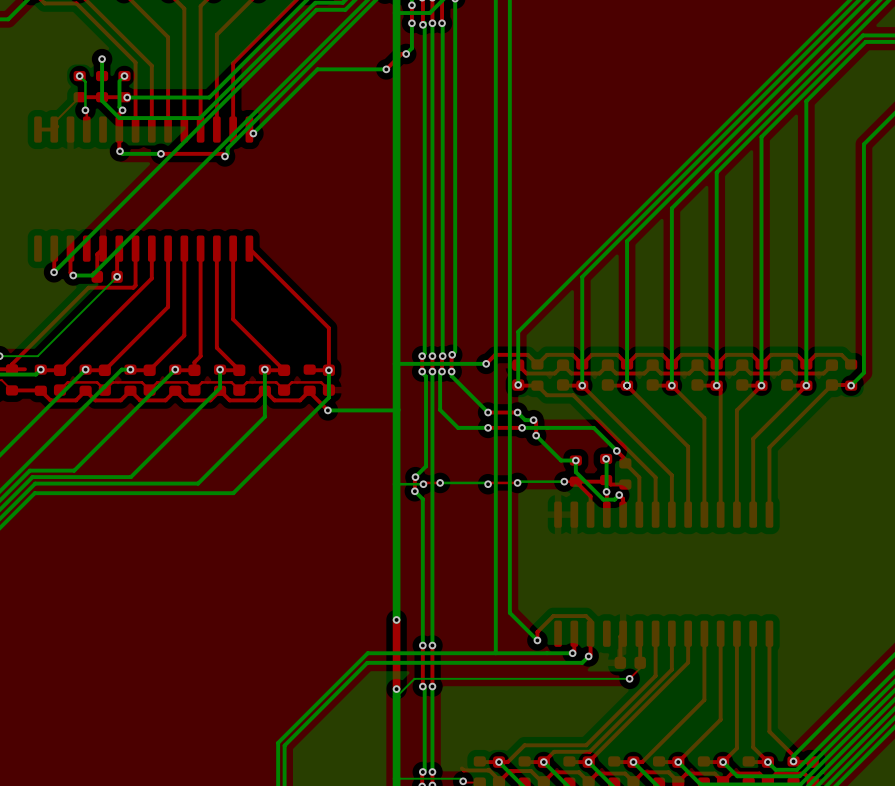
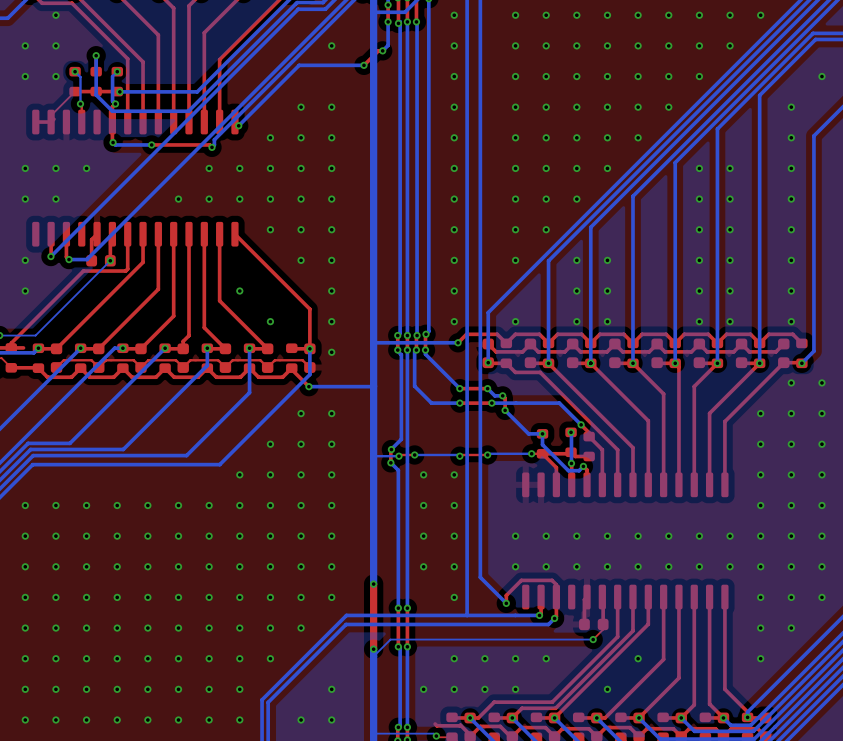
via: none -> (55, 15)
via: none -> (454, 15)
via: none -> (515, 15)
via: none -> (546, 15)
via: none -> (576, 15)
via: none -> (607, 15)
via: none -> (638, 15)
via: none -> (668, 15)
via: none -> (699, 15)
via: none -> (730, 15)
via: none -> (760, 15)
via: none -> (25, 45)
via: none -> (55, 45)
via: none -> (331, 45)
via: none -> (454, 45)
via: none -> (515, 45)
via: none -> (546, 45)
via: none -> (576, 45)
via: none -> (607, 45)
via: none -> (638, 45)
via: none -> (668, 45)
via: none -> (699, 45)
via: none -> (730, 45)
via: none -> (25, 76)
via: none -> (55, 76)
via: none -> (454, 76)
via: none -> (515, 76)
via: none -> (546, 76)
via: none -> (576, 76)
via: none -> (607, 76)
via: none -> (638, 76)
via: none -> (668, 76)
via: none -> (699, 76)
via: none -> (821, 76)
via: none -> (301, 107)
via: none -> (331, 107)
via: none -> (454, 107)
via: none -> (515, 107)
via: none -> (546, 107)
via: none -> (576, 107)
via: none -> (607, 107)
via: none -> (638, 107)
via: none -> (668, 107)
via: none -> (791, 107)
via: none -> (270, 137)
via: none -> (301, 137)
via: none -> (331, 137)
via: none -> (454, 137)
via: none -> (515, 137)
via: none -> (546, 137)
via: none -> (576, 137)
via: none -> (607, 137)
via: none -> (638, 137)
via: none -> (791, 137)
via: none -> (25, 168)
via: none -> (55, 168)
via: none -> (86, 168)
via: none -> (209, 168)
via: none -> (239, 168)
via: none -> (270, 168)
via: none -> (301, 168)
via: none -> (331, 168)
via: none -> (454, 168)
via: none -> (515, 168)
via: none -> (546, 168)
via: none -> (576, 168)
via: none -> (607, 168)
via: none -> (699, 168)
via: none -> (730, 168)
via: none -> (791, 168)
via: none -> (25, 199)
via: none -> (55, 199)
via: none -> (178, 199)
via: none -> (209, 199)
via: none -> (239, 199)
via: none -> (270, 199)
via: none -> (301, 199)
via: none -> (331, 199)
via: none -> (454, 199)
via: none -> (515, 199)
via: none -> (546, 199)
via: none -> (576, 199)
via: none -> (699, 199)
via: none -> (730, 199)
via: none -> (791, 199)
via: none -> (270, 229)
via: none -> (301, 229)
via: none -> (331, 229)
via: none -> (454, 229)
via: none -> (515, 229)
via: none -> (546, 229)
via: none -> (699, 229)
via: none -> (730, 229)
via: none -> (791, 229)
via: none -> (25, 260)
via: none -> (301, 260)
via: none -> (331, 260)
via: none -> (454, 260)
via: none -> (515, 260)
via: none -> (576, 260)
via: none -> (607, 260)
via: none -> (699, 260)
via: none -> (730, 260)
via: none -> (791, 260)
via: none -> (25, 291)
via: none -> (239, 291)
via: none -> (331, 291)
via: none -> (454, 291)
via: none -> (576, 291)
via: none -> (607, 291)
via: none -> (699, 291)
via: none -> (730, 291)
via: none -> (791, 291)
via: none -> (270, 321)
via: none -> (331, 321)
via: none -> (454, 321)
via: none -> (515, 321)
via: none -> (576, 321)
via: none -> (607, 321)
via: none -> (699, 321)
via: none -> (730, 321)
via: none -> (791, 321)
via: none -> (331, 352)
via: none -> (791, 382)
via: none -> (821, 382)
via: none -> (301, 413)
via: none -> (331, 413)
via: none -> (760, 413)
via: none -> (791, 413)
via: none -> (821, 413)
via: none -> (270, 444)
via: none -> (301, 444)
via: none -> (331, 444)
via: none -> (760, 444)
via: none -> (791, 444)
via: none -> (821, 444)
via: none -> (239, 474)
via: none -> (270, 474)
via: none -> (301, 474)
via: none -> (331, 474)
via: none -> (423, 474)
via: none -> (454, 474)
via: none -> (760, 474)
via: none -> (791, 474)
via: none -> (821, 474)
via: none -> (25, 505)
via: none -> (55, 505)
via: none -> (86, 505)
via: none -> (117, 505)
via: none -> (147, 505)
via: none -> (178, 505)
via: none -> (209, 505)
via: none -> (239, 505)
via: none -> (270, 505)
via: none -> (301, 505)
via: none -> (331, 505)
via: none -> (423, 505)
via: none -> (454, 505)
via: none -> (760, 505)
via: none -> (791, 505)
via: none -> (821, 505)
via: none -> (25, 536)
via: none -> (55, 536)
via: none -> (86, 536)
via: none -> (117, 536)
via: none -> (147, 536)
via: none -> (178, 536)
via: none -> (209, 536)
via: none -> (239, 536)
via: none -> (270, 536)
via: none -> (301, 536)
via: none -> (331, 536)
via: none -> (423, 536)
via: none -> (454, 536)
via: none -> (515, 536)
via: none -> (546, 536)
via: none -> (576, 536)
via: none -> (607, 536)
via: none -> (638, 536)
via: none -> (668, 536)
via: none -> (699, 536)
via: none -> (730, 536)
via: none -> (760, 536)
via: none -> (791, 536)
via: none -> (821, 536)
via: none -> (25, 566)
via: none -> (55, 566)
via: none -> (86, 566)
via: none -> (117, 566)
via: none -> (147, 566)
via: none -> (178, 566)
via: none -> (209, 566)
via: none -> (239, 566)
via: none -> (270, 566)
via: none -> (301, 566)
via: none -> (331, 566)
via: none -> (423, 566)
via: none -> (454, 566)
via: none -> (515, 566)
via: none -> (546, 566)
via: none -> (576, 566)
via: none -> (607, 566)
via: none -> (638, 566)
via: none -> (668, 566)
via: none -> (699, 566)
via: none -> (730, 566)
via: none -> (760, 566)
via: none -> (791, 566)
via: none -> (821, 566)
via: none -> (25, 597)
via: none -> (55, 597)
via: none -> (86, 597)
via: none -> (117, 597)
via: none -> (147, 597)
via: none -> (178, 597)
via: none -> (209, 597)
via: none -> (239, 597)
via: none -> (270, 597)
via: none -> (301, 597)
via: none -> (331, 597)
via: none -> (454, 597)
via: none -> (760, 597)
via: none -> (791, 597)
via: none -> (821, 597)
via: none -> (25, 628)
via: none -> (55, 628)
via: none -> (86, 628)
via: none -> (117, 628)
via: none -> (147, 628)
via: none -> (178, 628)
via: none -> (209, 628)
via: none -> (239, 628)
via: none -> (270, 628)
via: none -> (301, 628)
via: none -> (760, 628)
via: none -> (791, 628)
via: none -> (25, 658)
via: none -> (55, 658)
via: none -> (86, 658)
via: none -> (117, 658)
via: none -> (147, 658)
via: none -> (178, 658)
via: none -> (209, 658)
via: none -> (239, 658)
via: none -> (270, 658)
via: none -> (454, 658)
via: none -> (484, 658)
via: none -> (515, 658)
via: none -> (546, 658)
via: none -> (638, 658)
via: none -> (760, 658)
via: none -> (25, 689)
via: none -> (55, 689)
via: none -> (86, 689)
via: none -> (117, 689)
via: none -> (147, 689)
via: none -> (178, 689)
via: none -> (209, 689)
via: none -> (239, 689)
via: none -> (331, 689)
via: none -> (423, 689)
via: none -> (454, 689)
via: none -> (484, 689)
via: none -> (515, 689)
via: none -> (607, 689)
via: none -> (25, 719)
via: none -> (55, 719)
via: none -> (86, 719)
via: none -> (117, 719)
via: none -> (147, 719)
via: none -> (178, 719)
via: none -> (209, 719)
via: none -> (239, 719)
via: none -> (301, 719)
via: none -> (331, 719)

